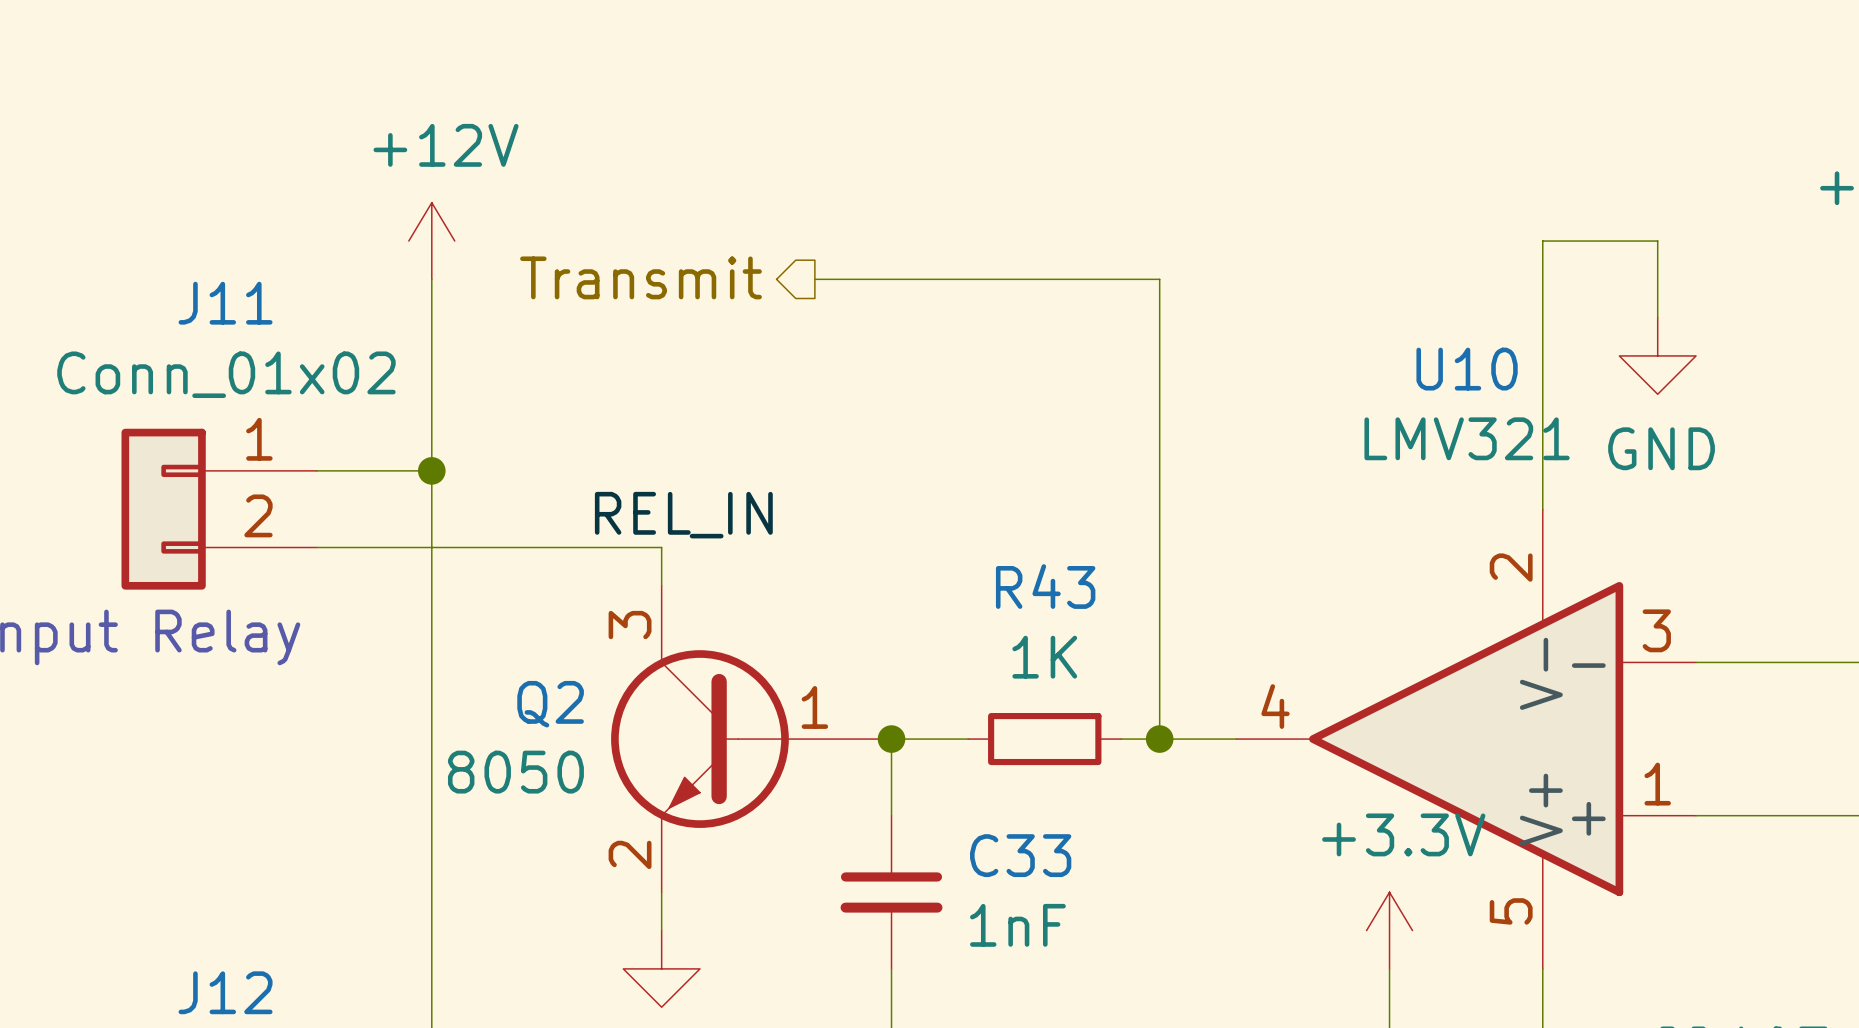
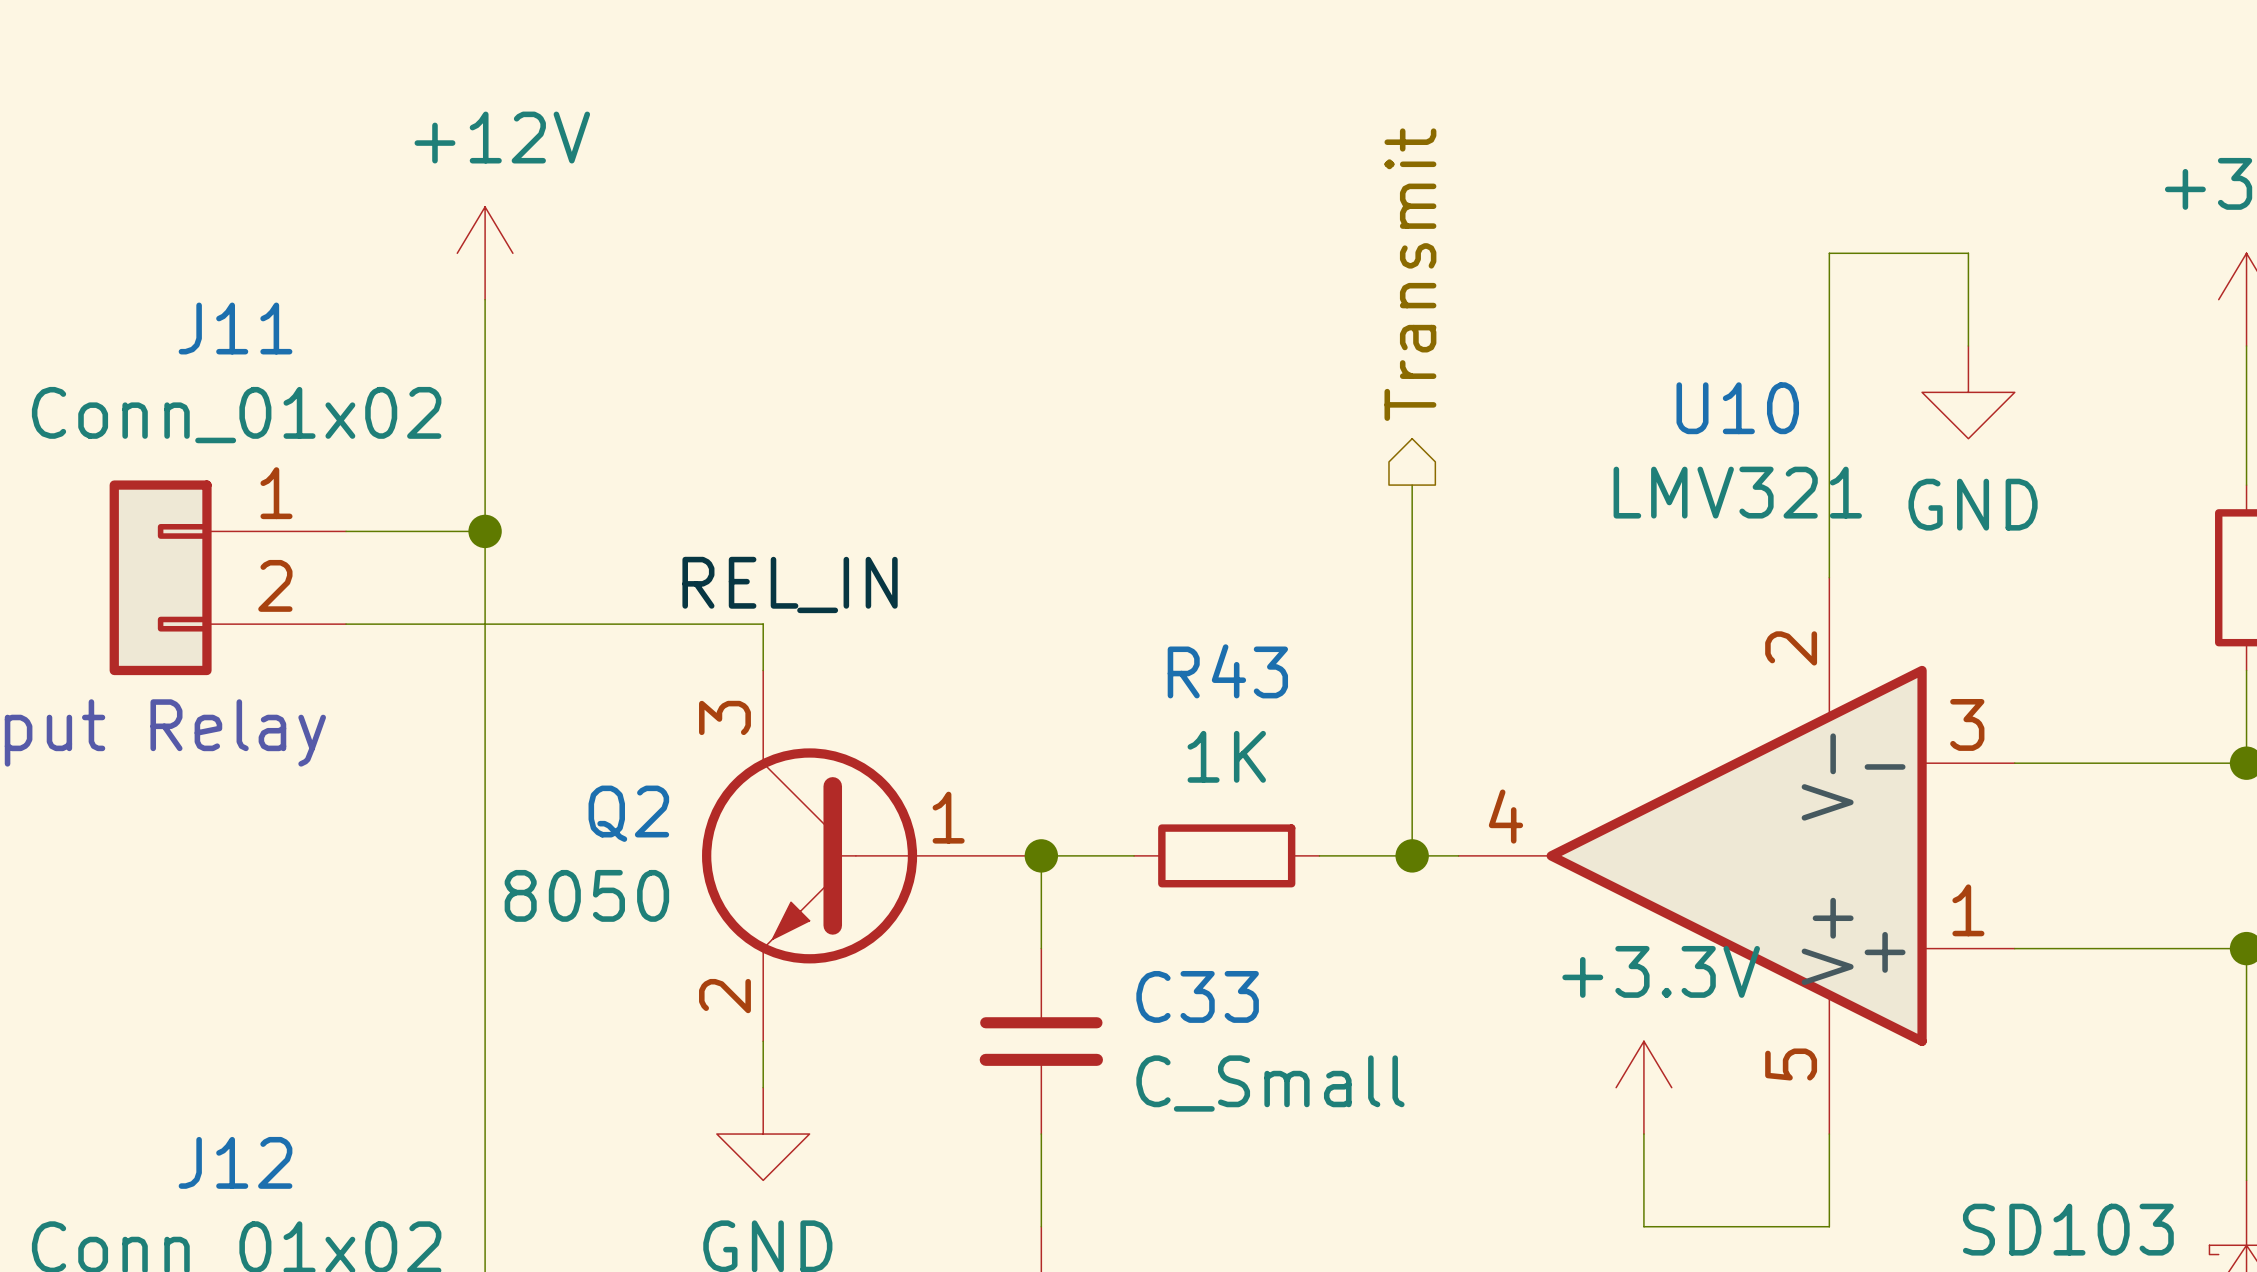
hierarchical label rotation: 0° (640, 277) -> 90° clockwise (1410, 274)
hierarchical label position: Transmit (640, 277) -> Transmit (1410, 274)
wire: (814, 279) (1159, 279) (1159, 739) -> none
wire: none -> (1412, 485) (1412, 855)
junction position: (1159, 739) -> (1412, 855)
C33 value: 1nF (1017, 925) -> C_Small (1270, 1083)

